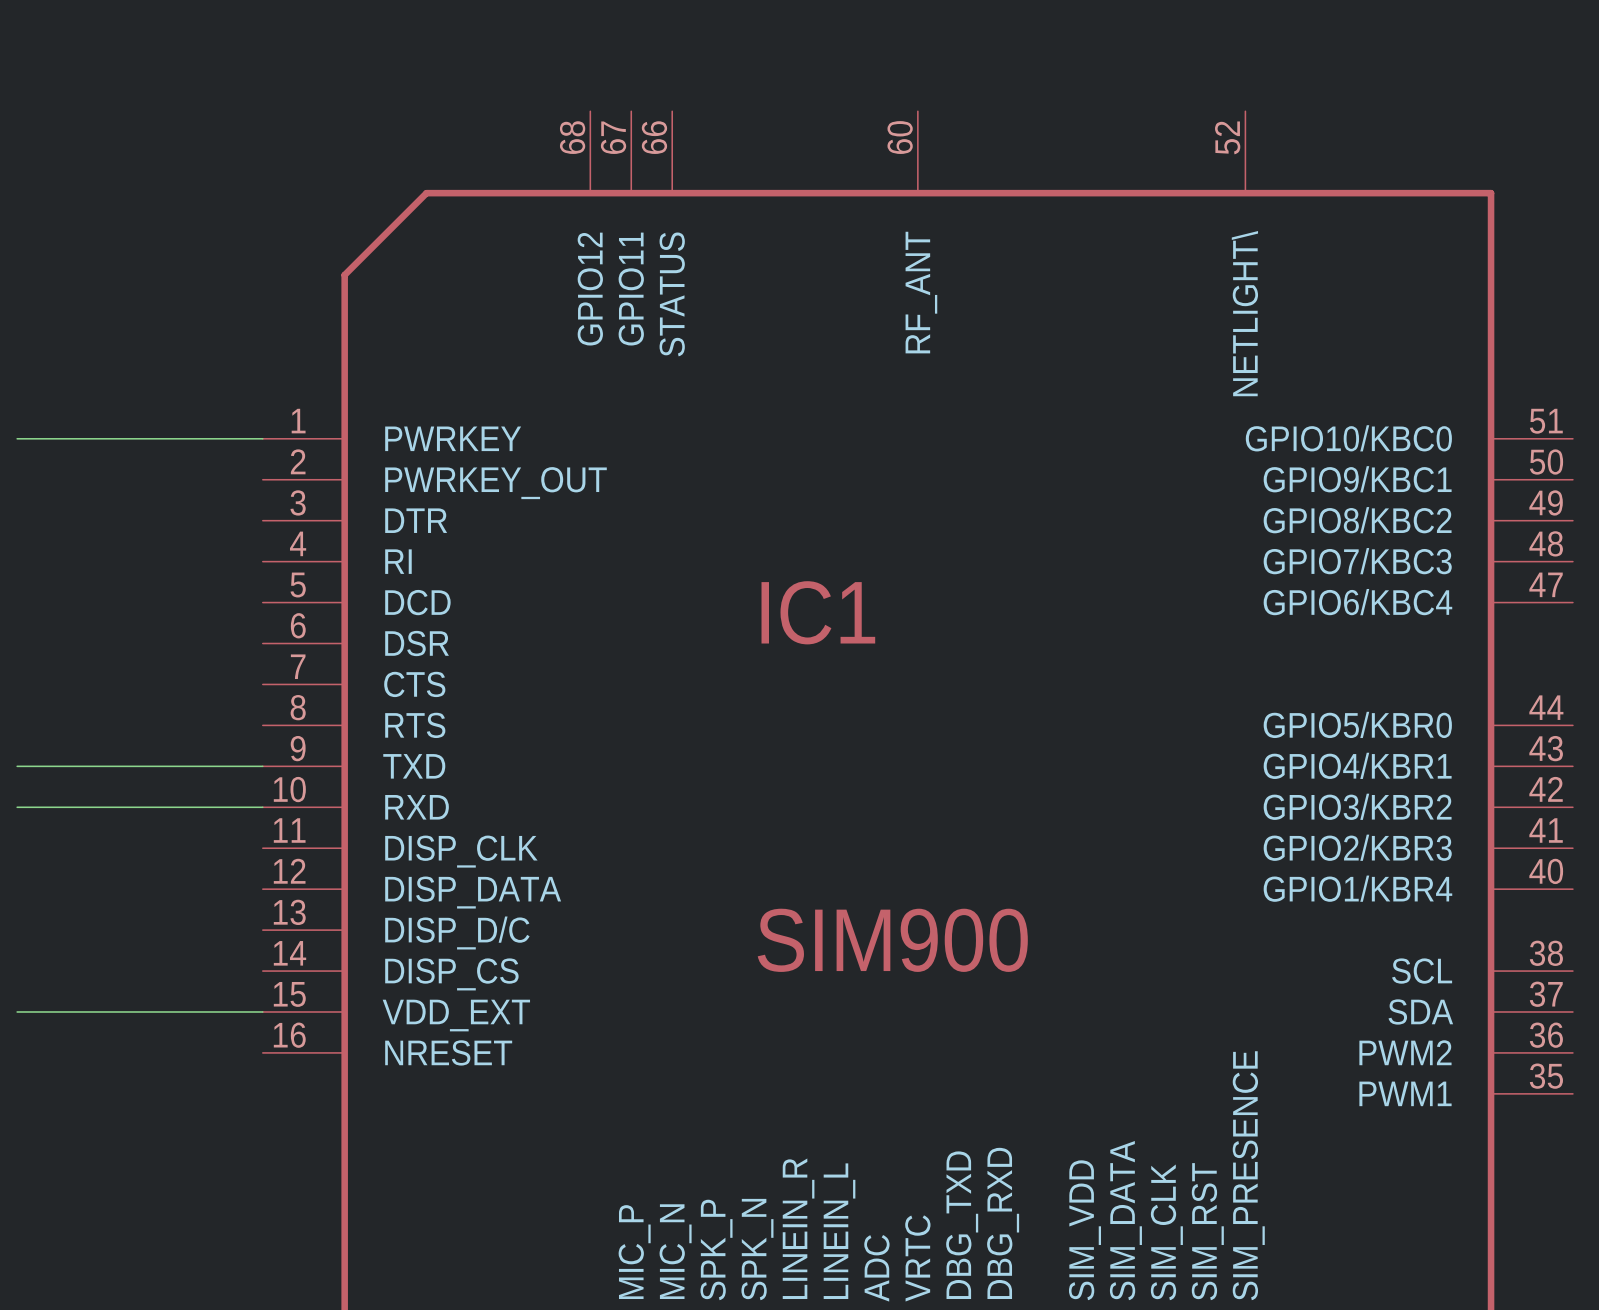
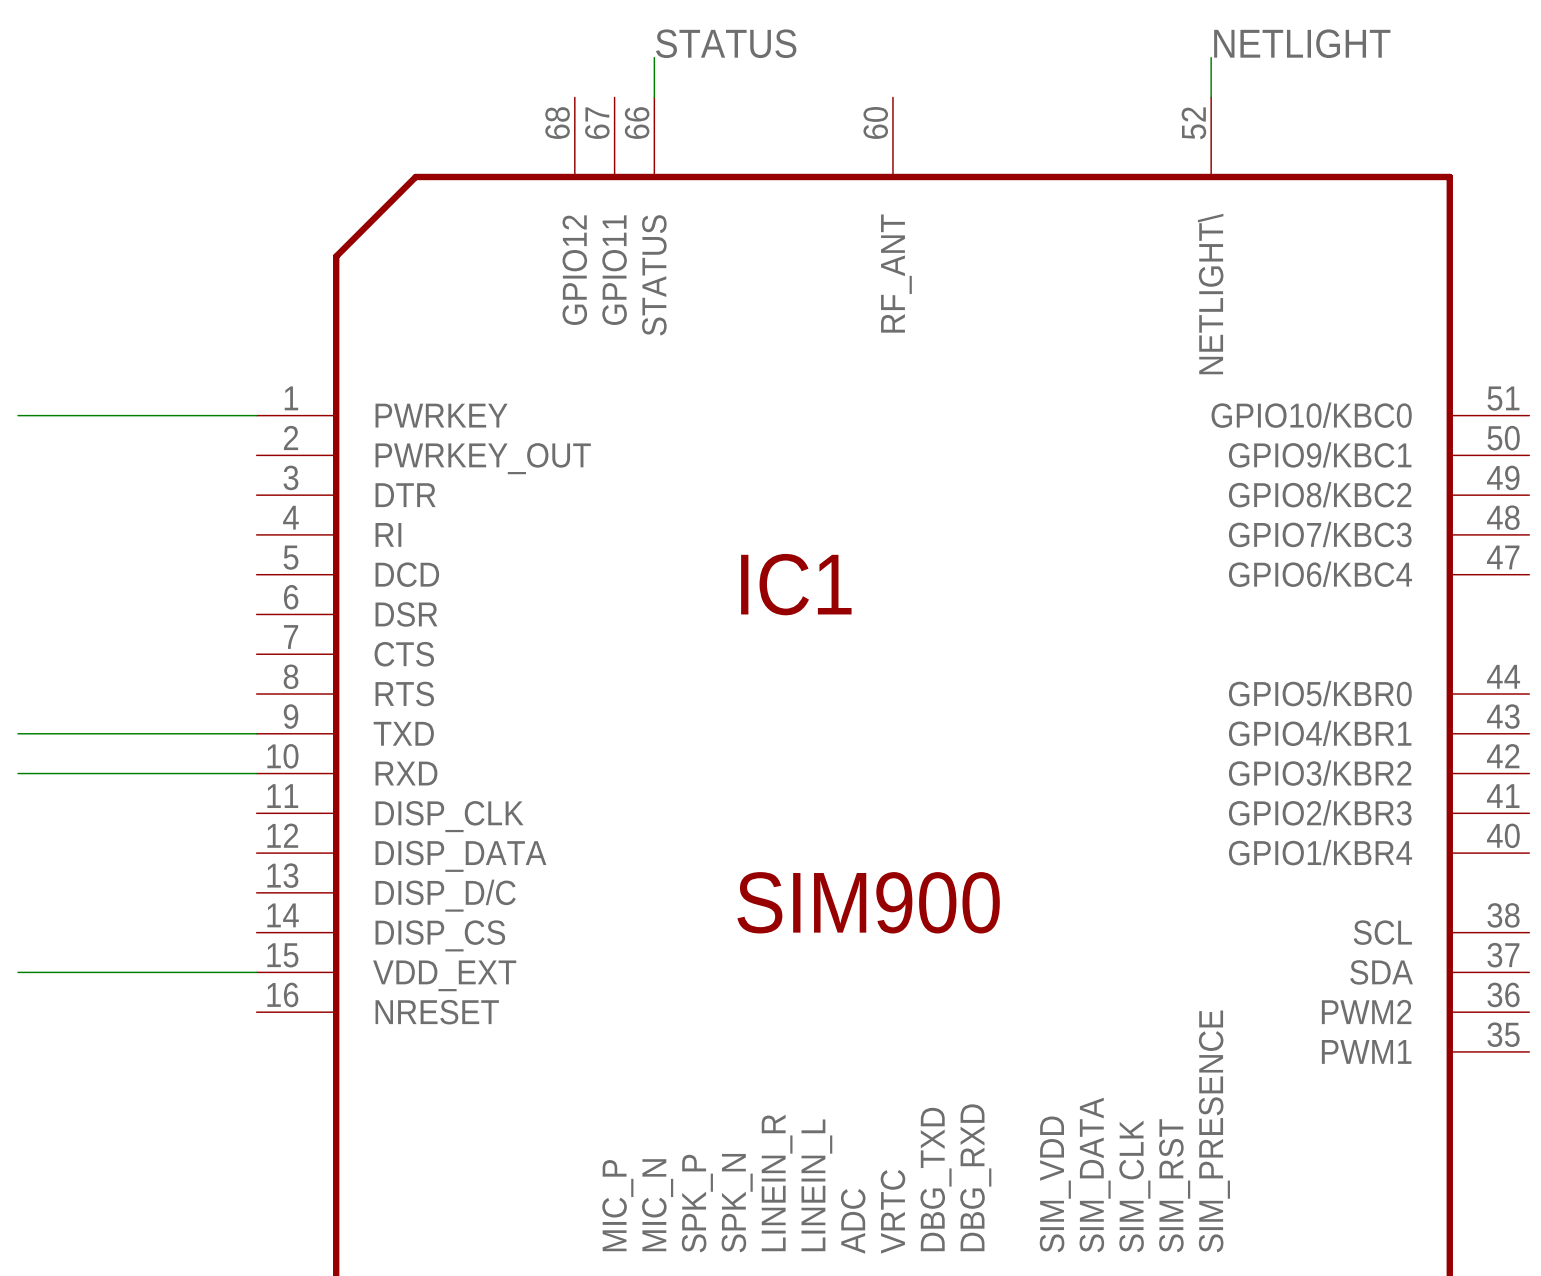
label: none -> STATUS (726, 43)
label: none -> NETLIGHT (1302, 43)
wire: none -> (654, 57) (654, 97)
wire: none -> (1211, 57) (1211, 97)

